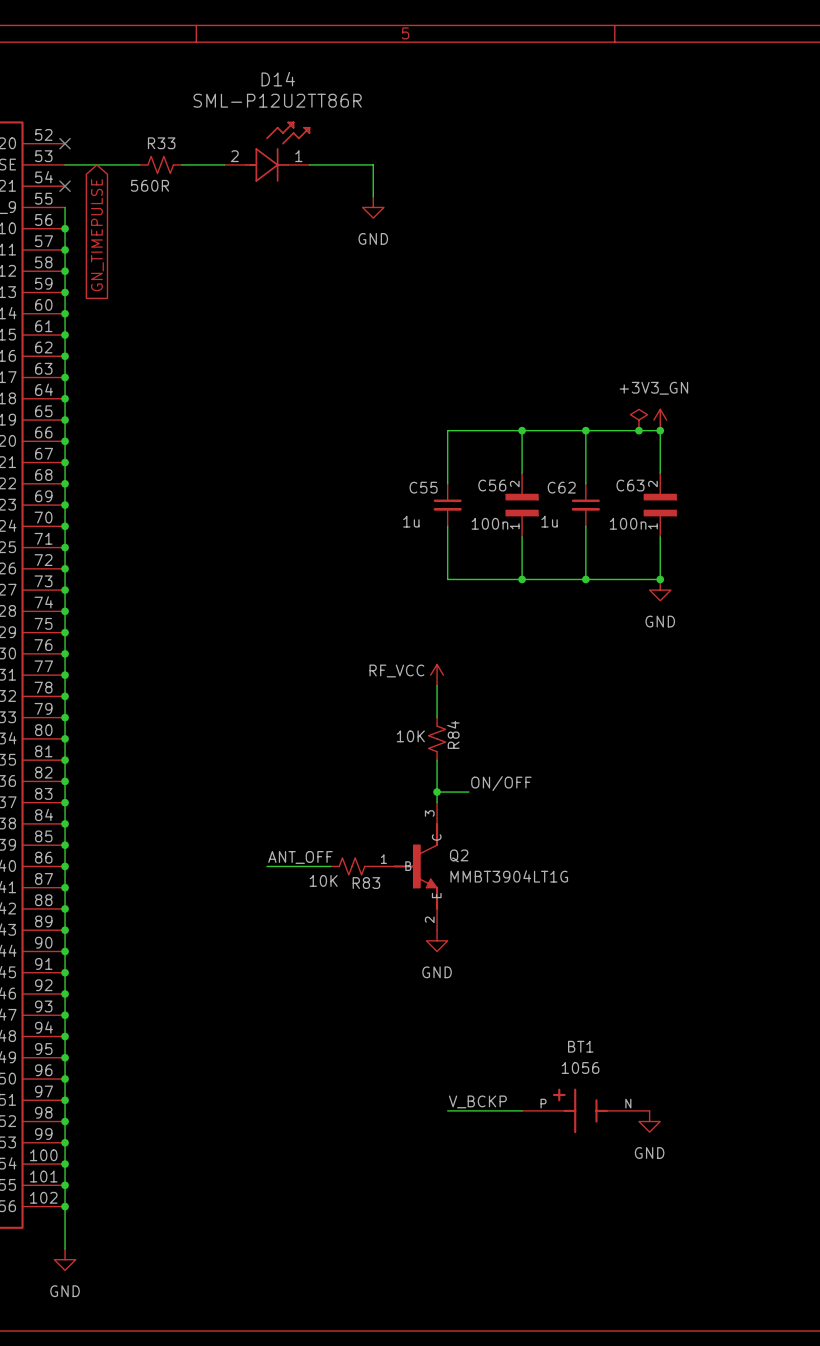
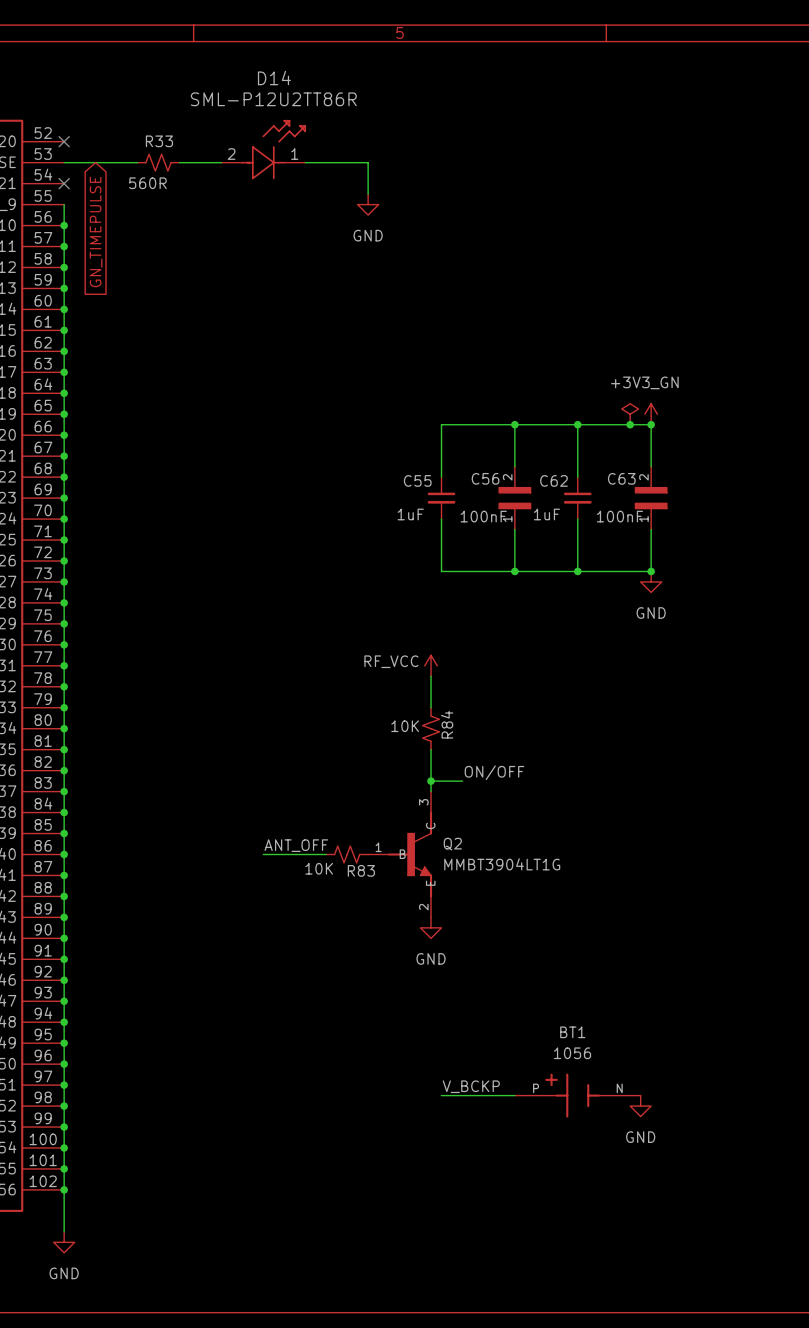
C55 value: 1u (411, 521) -> 1uF (410, 514)
C62 value: 1u (549, 521) -> 1uF (546, 514)
C56 value: 100n (489, 523) -> 100nF (483, 516)
C63 value: 100n (628, 523) -> 100nF (619, 516)

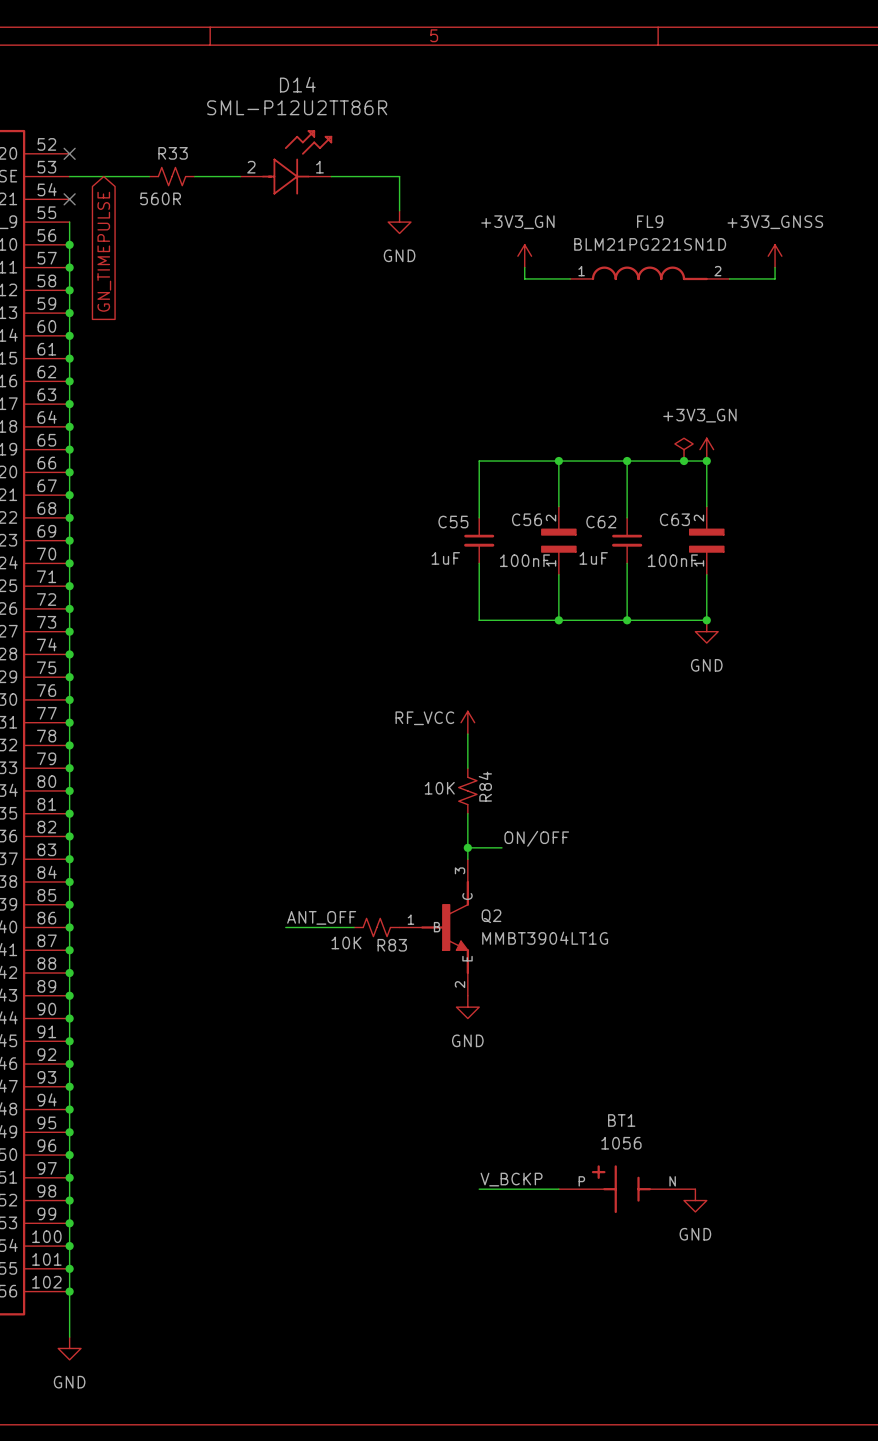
power symbol: none -> +3V3_GN (524, 256)
power symbol: none -> +3V3_GNSS (775, 256)
wire: none -> (524, 267) (524, 278) (570, 278)
wire: none -> (775, 267) (775, 278) (729, 278)
FL9: none -> BLM21PG221SN1D (649, 273)

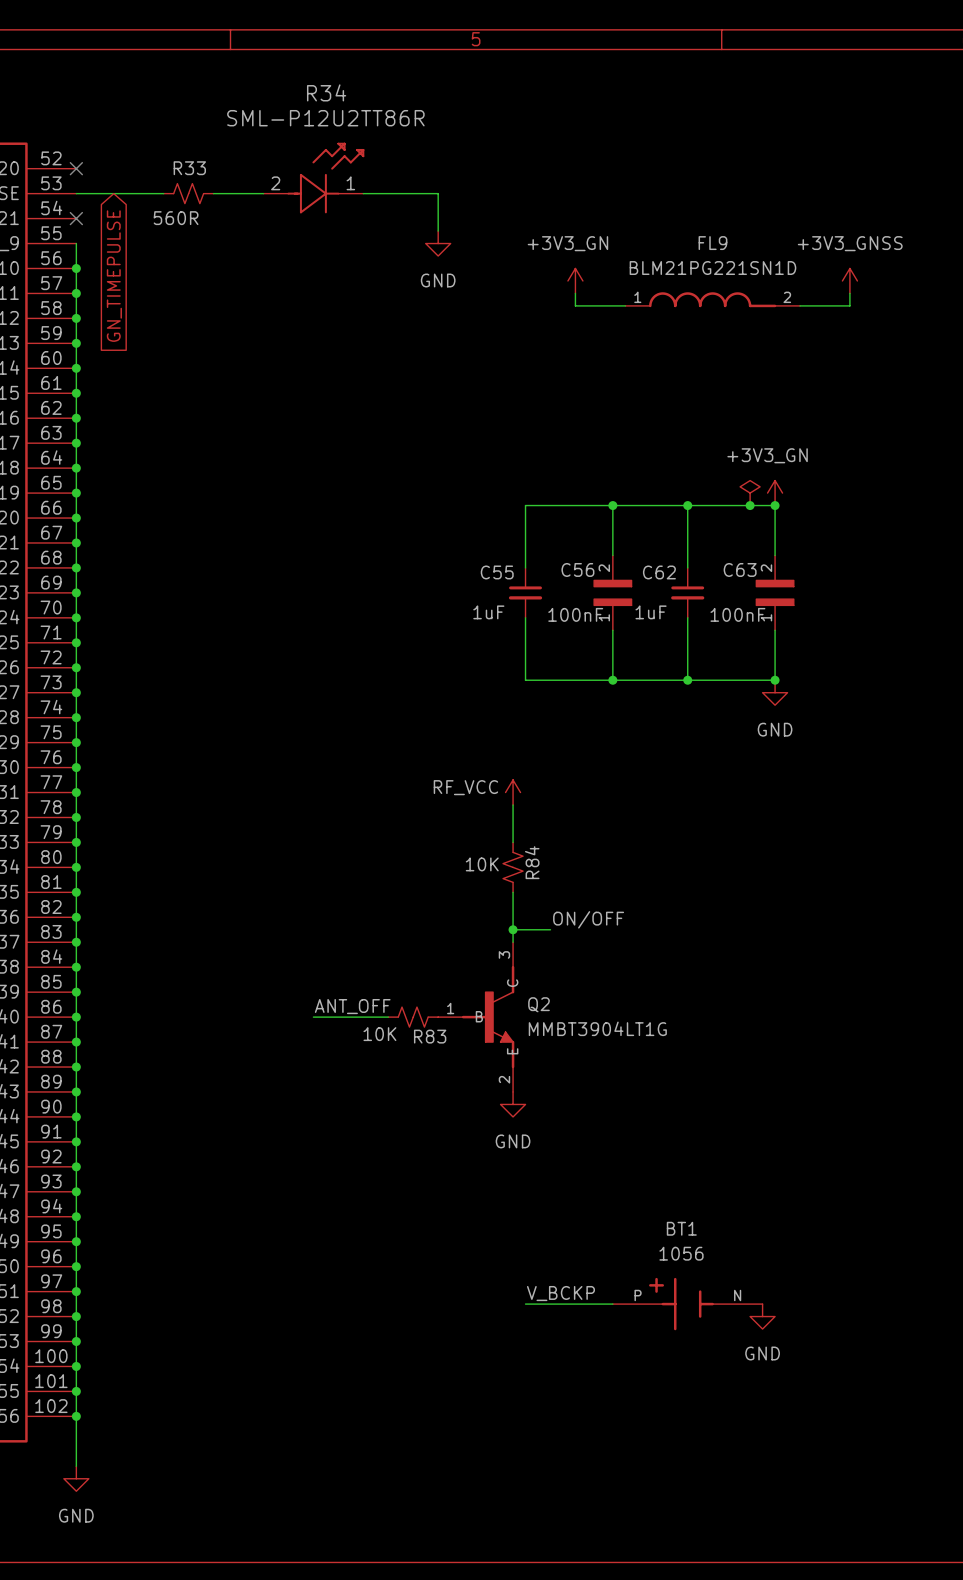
D14 name: D14 (297, 84) -> R34 (326, 92)

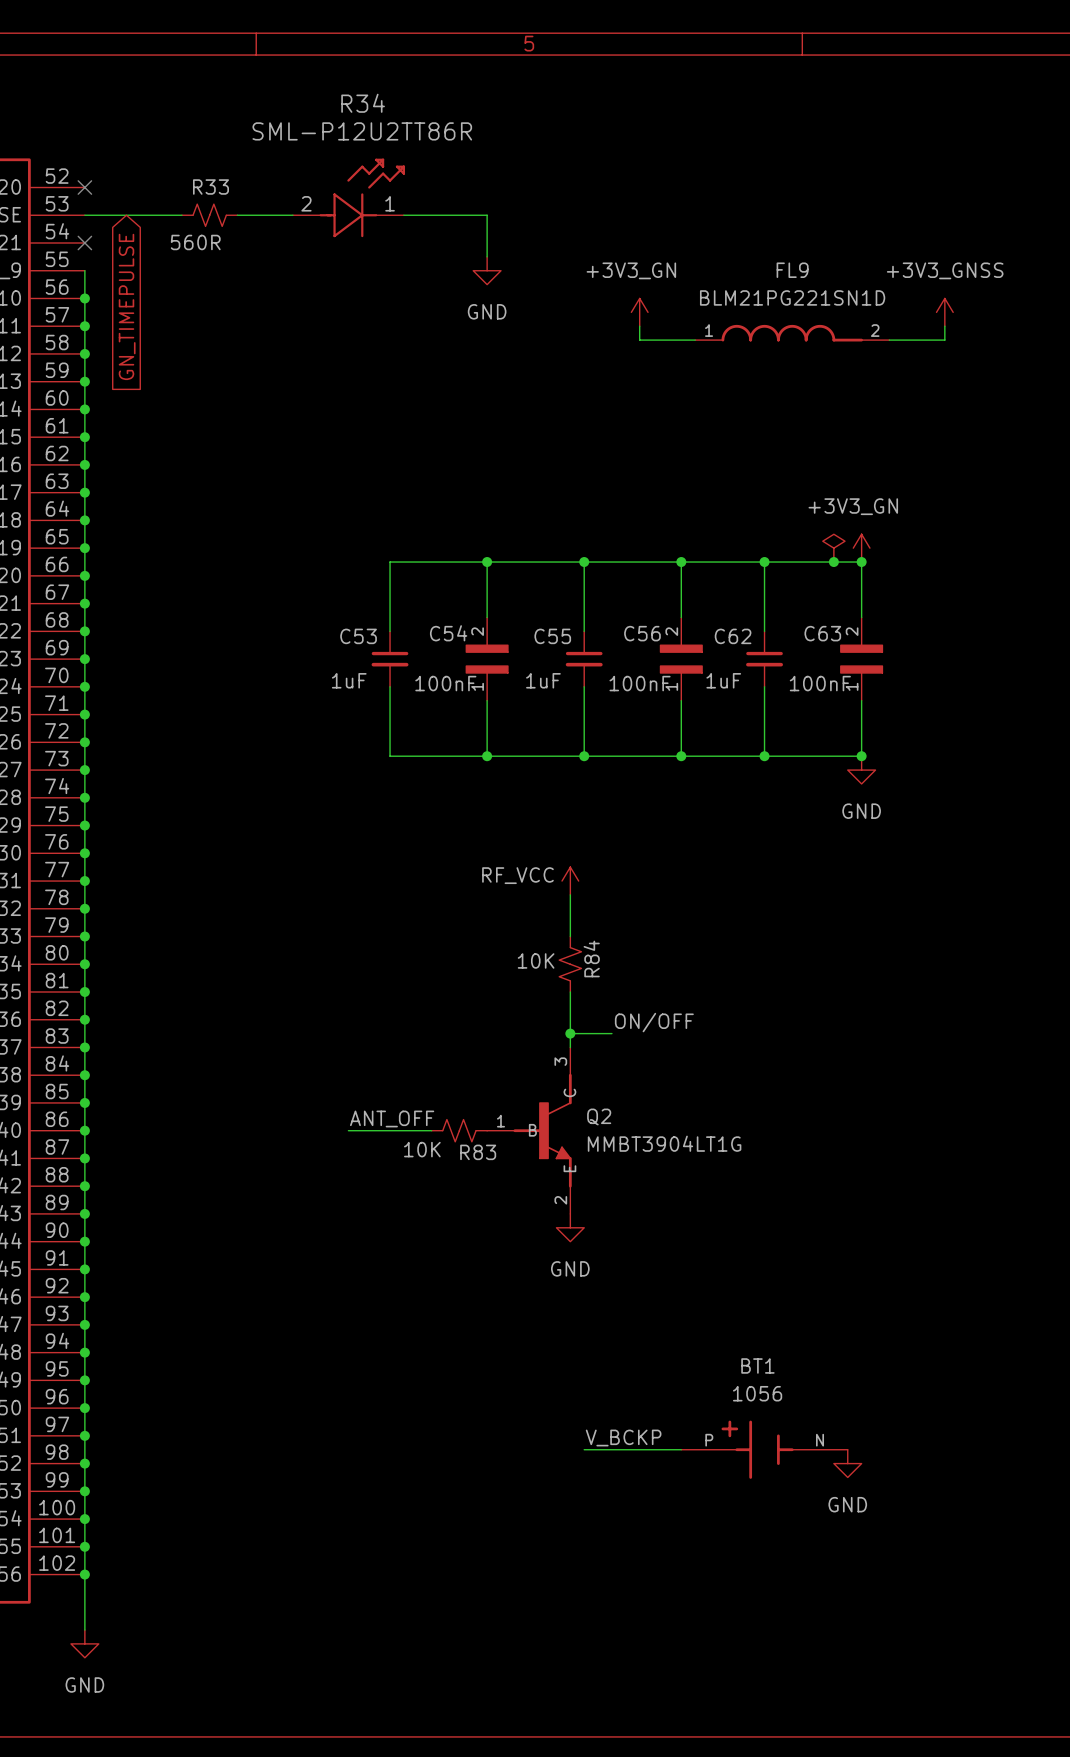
wire: none -> (487, 562) (487, 617)
junction: none -> (487, 562)
wire: none -> (584, 562) (390, 562) (390, 631)
junction: none -> (584, 562)
C53: none -> 1uF (390, 659)
C54: none -> 100nF (487, 659)
wire: none -> (390, 686) (390, 756) (584, 756)
wire: none -> (487, 700) (487, 756)
junction: none -> (487, 756)
junction: none -> (584, 756)

